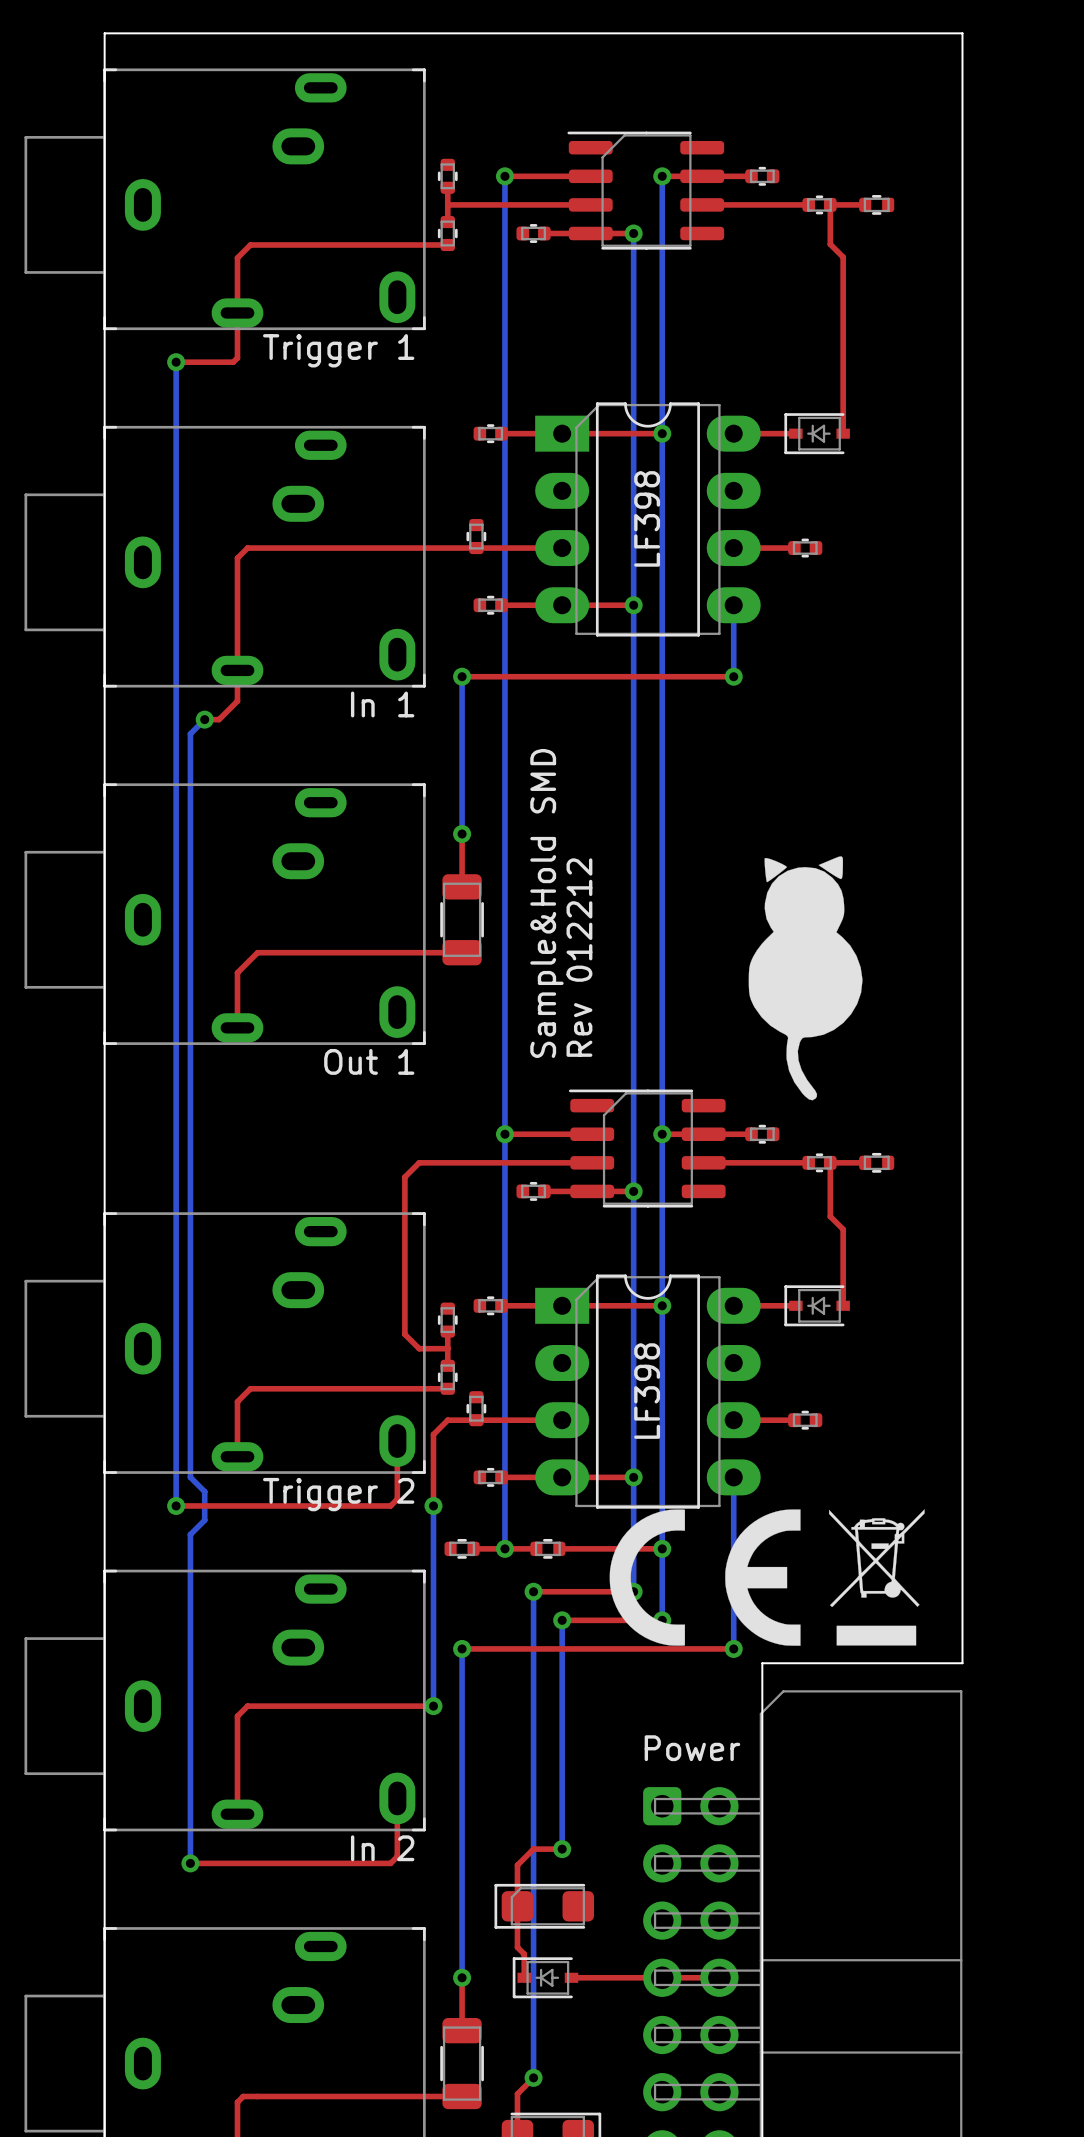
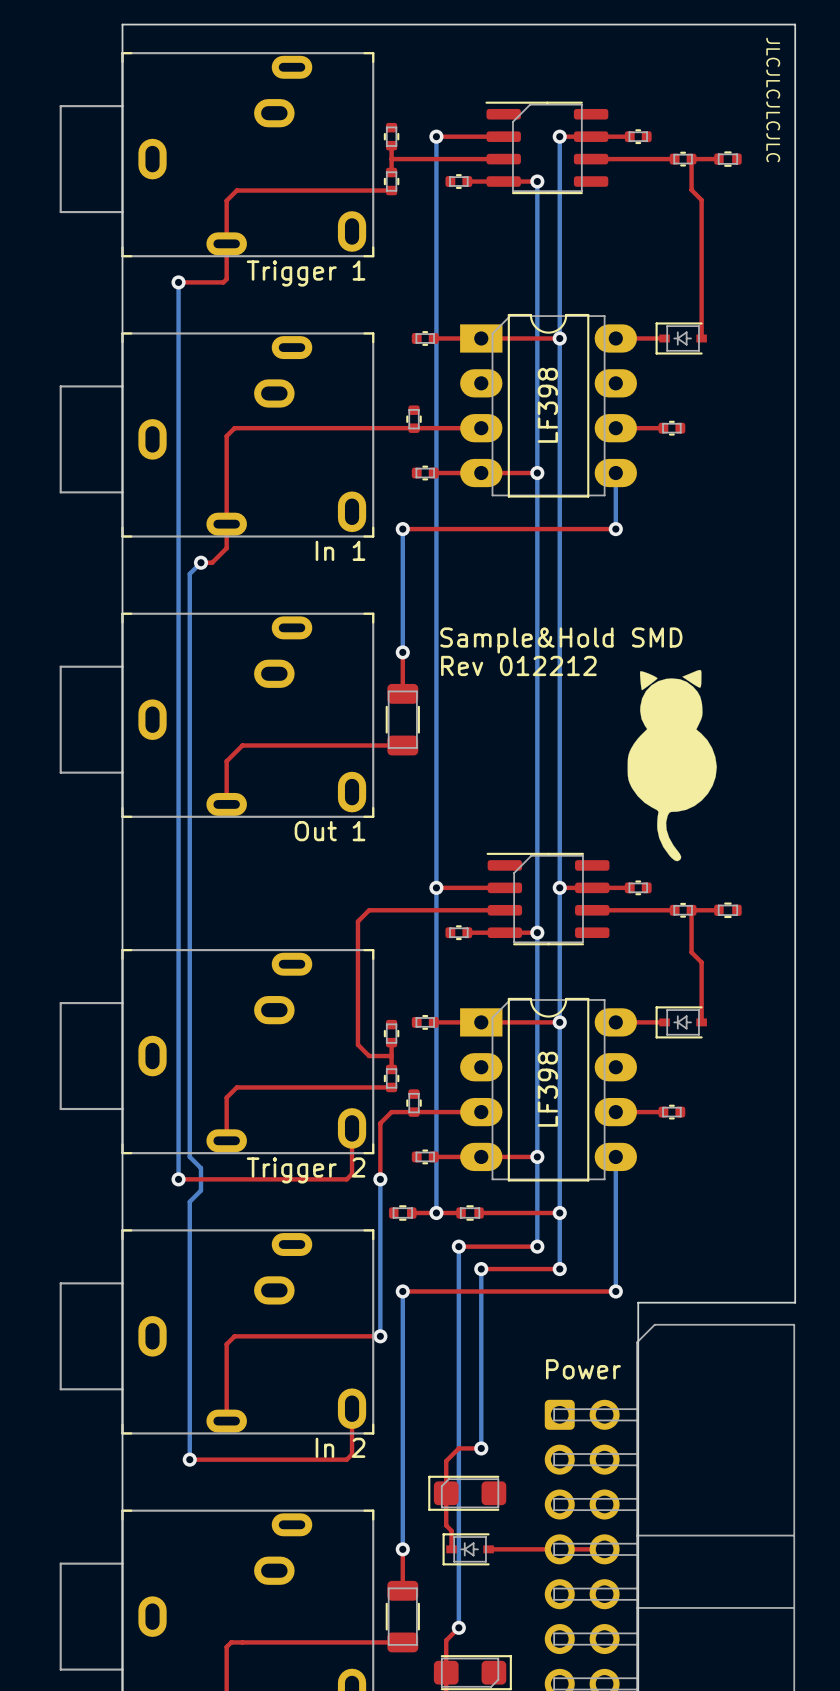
text: none -> JLCJLCJLCJLC (773, 99)
text rotation: 0° (546, 903) -> 90° clockwise (561, 640)
text rotation: 0° (579, 957) -> 90° clockwise (518, 665)
drawing: [609, 1509, 801, 1646] -> none
drawing: [829, 1509, 925, 1646] -> none

